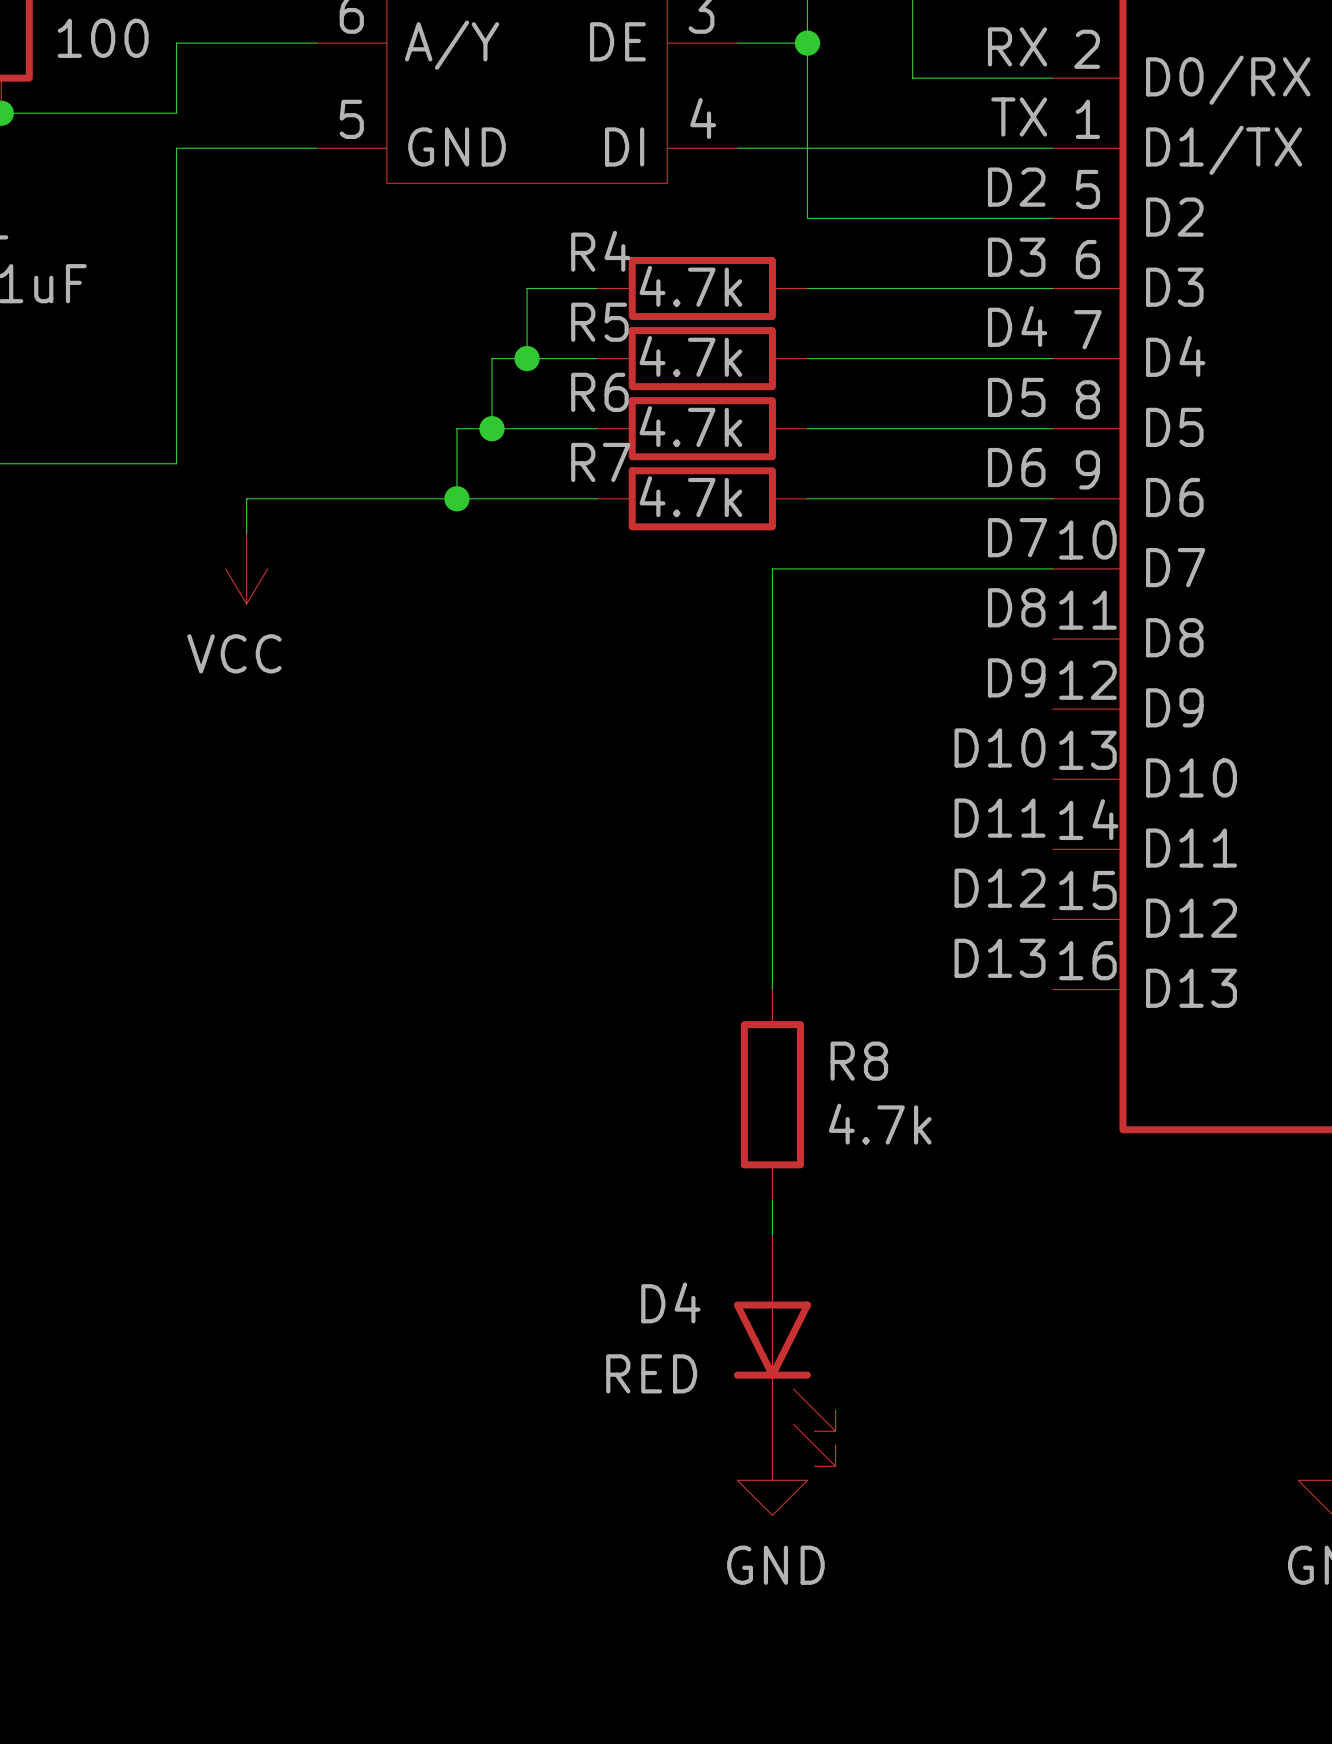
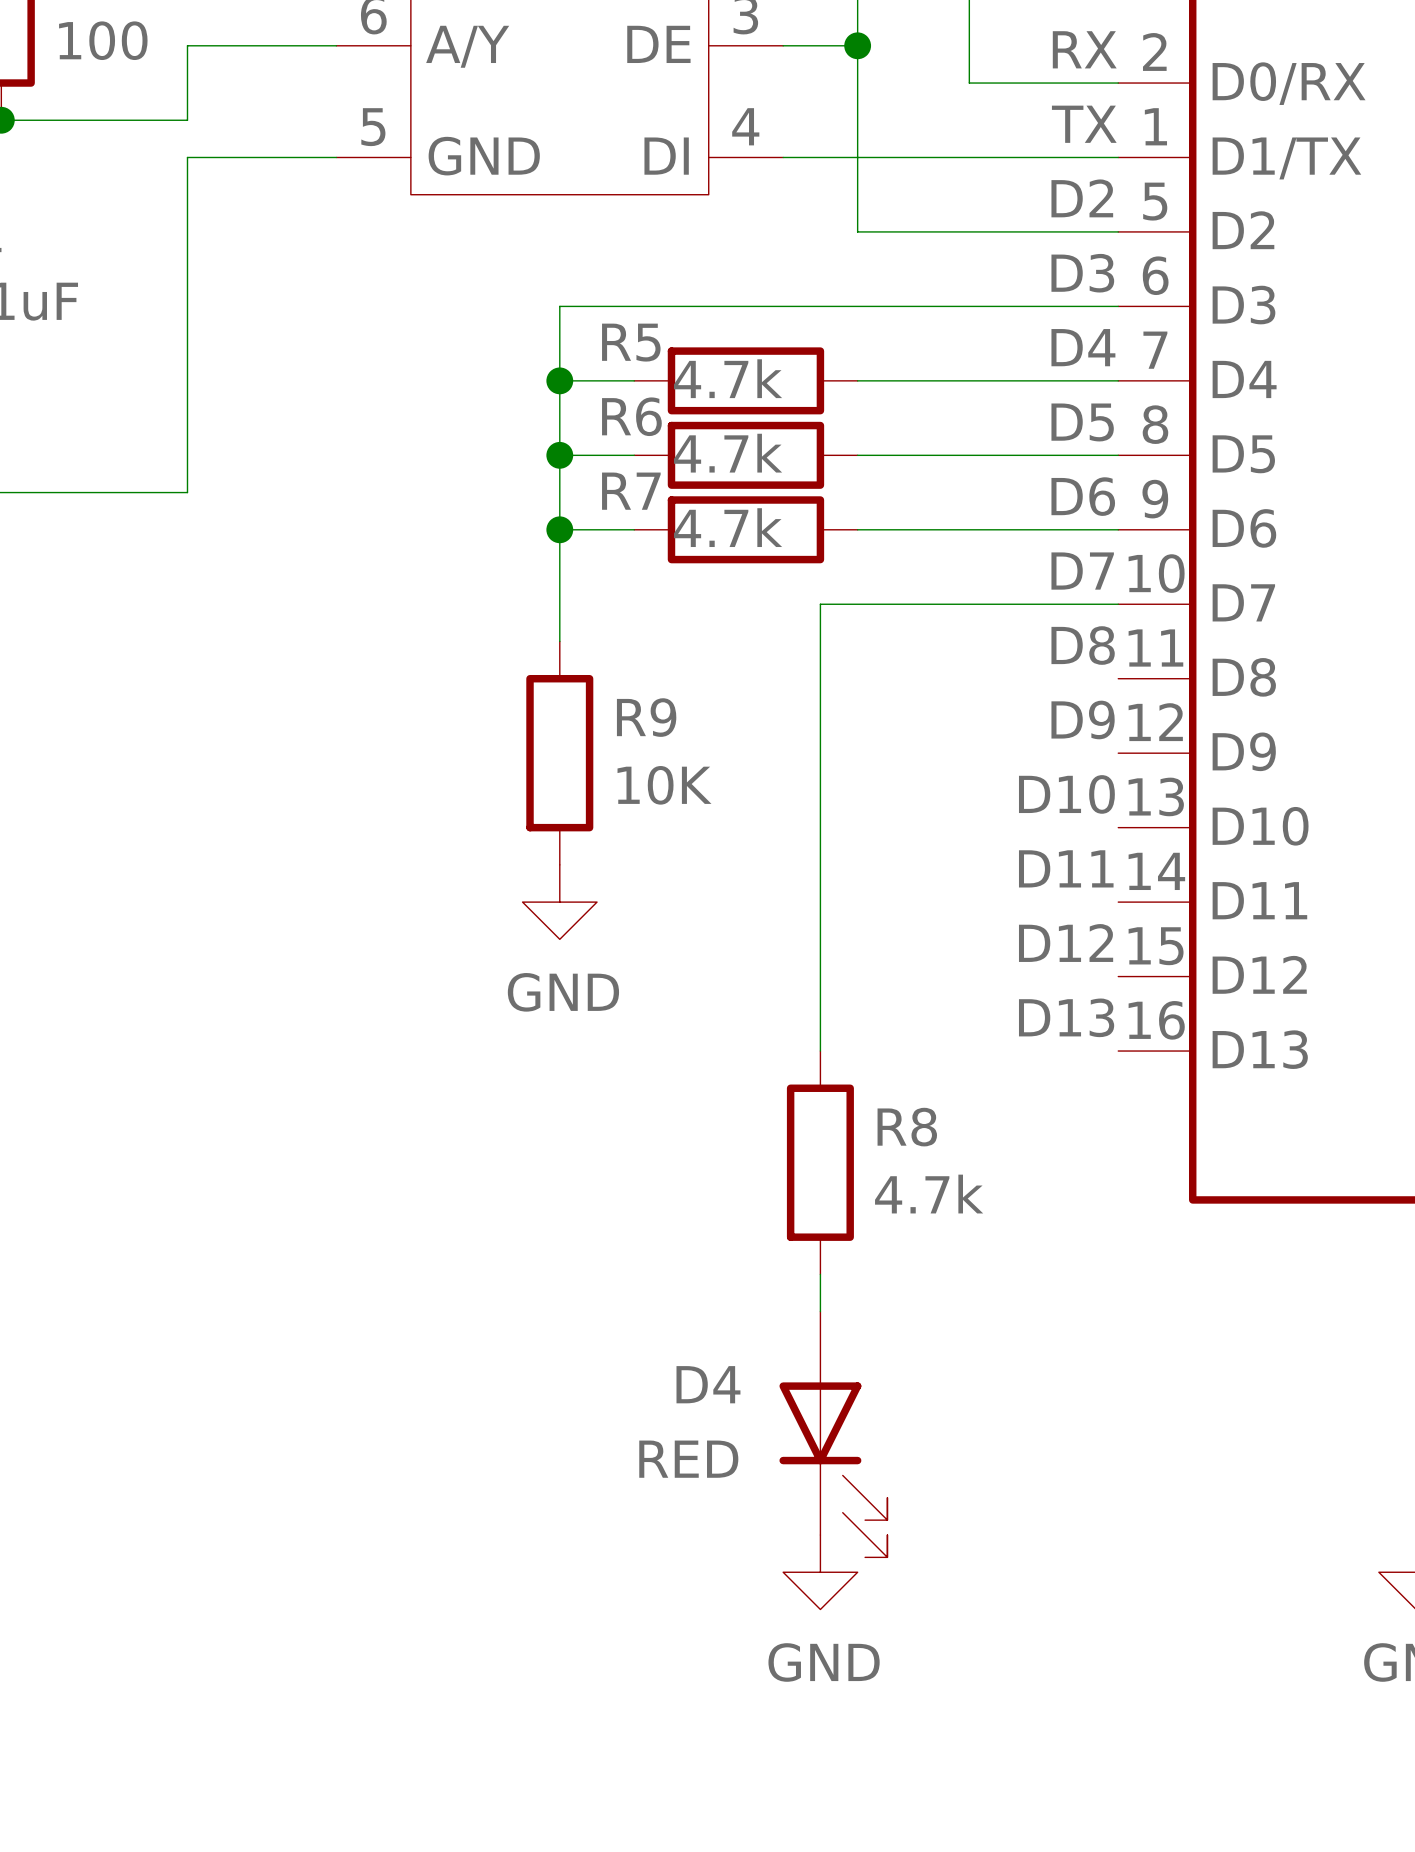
wire: none -> (634, 306) (857, 306)
R4: 4.7k (702, 288) -> none
wire: (527, 358) (492, 358) (492, 428) -> (559, 380) (559, 641)
junction position: (492, 428) -> (559, 455)
wire: (527, 428) (456, 428) (456, 498) -> none
junction: (456, 498) -> none
wire: (527, 498) (246, 498) (246, 533) -> none
junction: none -> (559, 529)
power symbol: VCC (246, 568) -> none
R9: none -> 10K (559, 753)
power symbol: none -> GND (559, 902)

